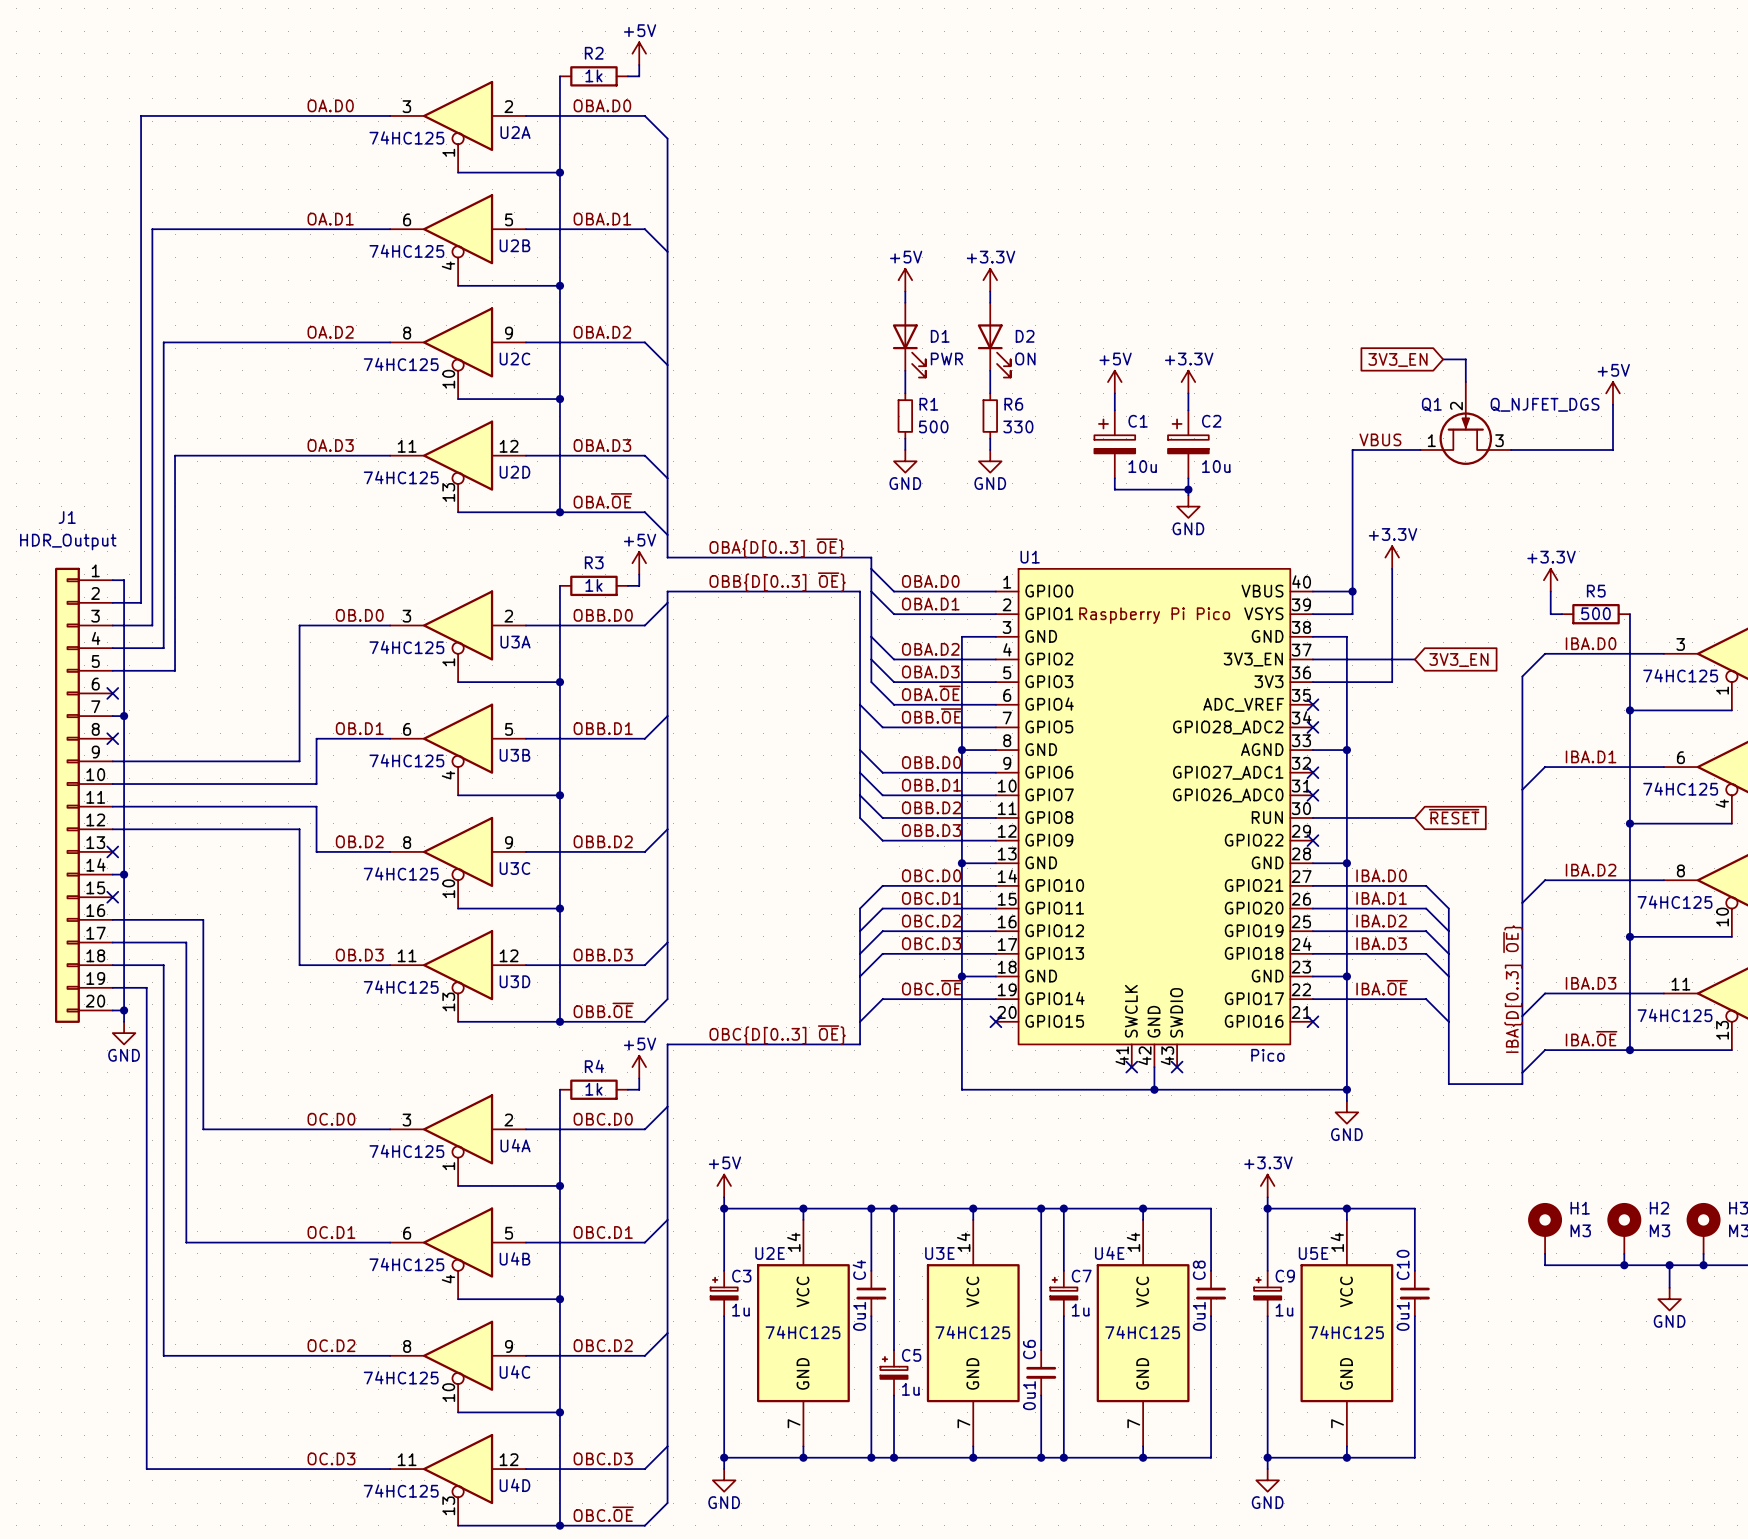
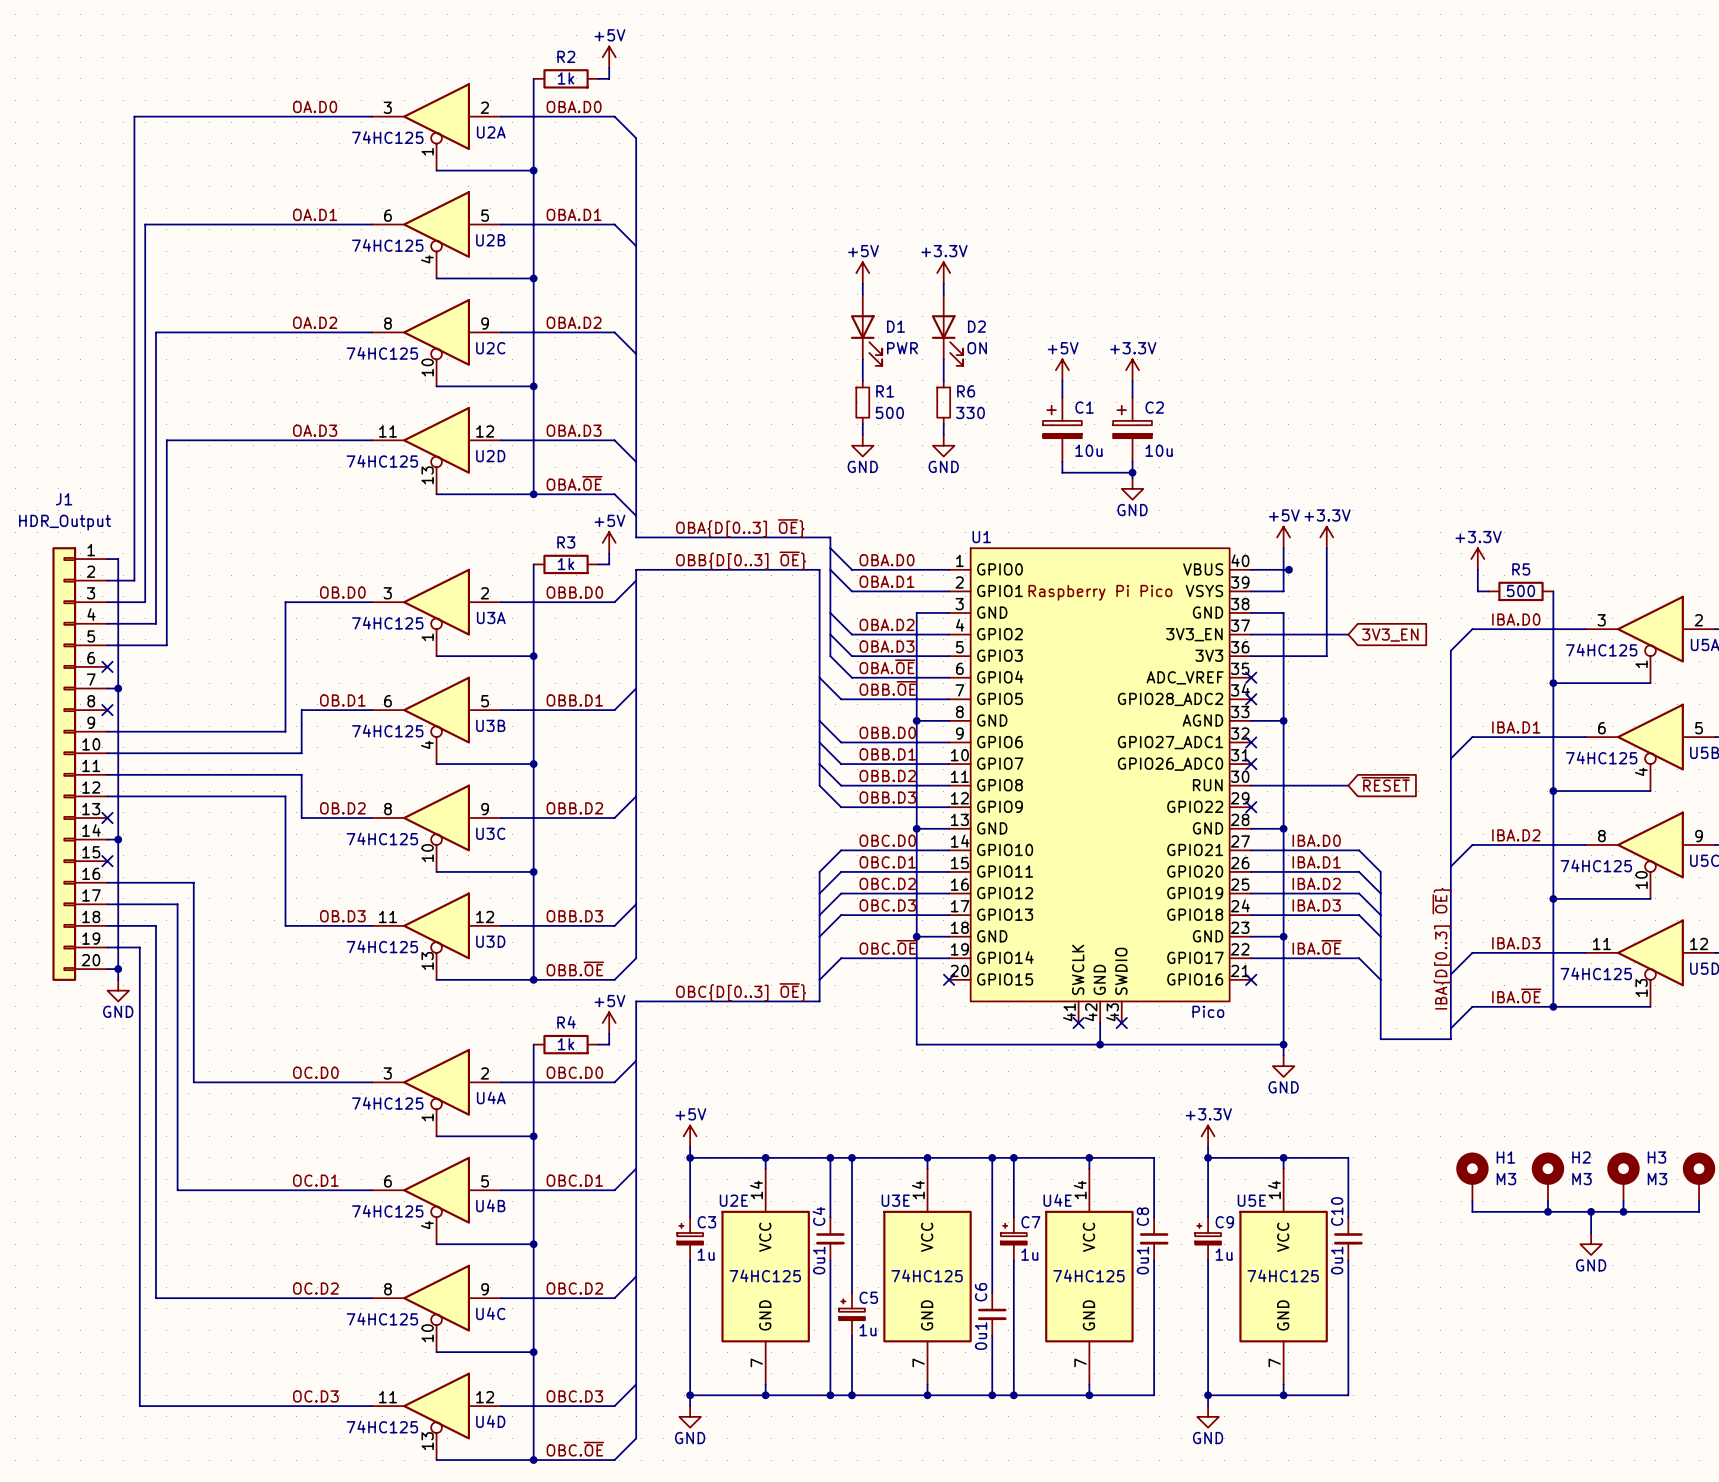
global label: 3V3_EN (1397, 359) -> none
wire: (1443, 359) (1465, 359) (1465, 382) -> none
power symbol: +5V (1612, 393) -> none
wire: (1612, 404) (1612, 450) (1511, 450) -> none
Q1: Q_NJFET_DGS (1465, 423) -> none
label: VBUS (1380, 439) -> none
wire: (1420, 450) (1352, 450) (1352, 614) (1346, 614) -> (1283, 548) (1283, 591)
power symbol: none -> +5V (1283, 537)

